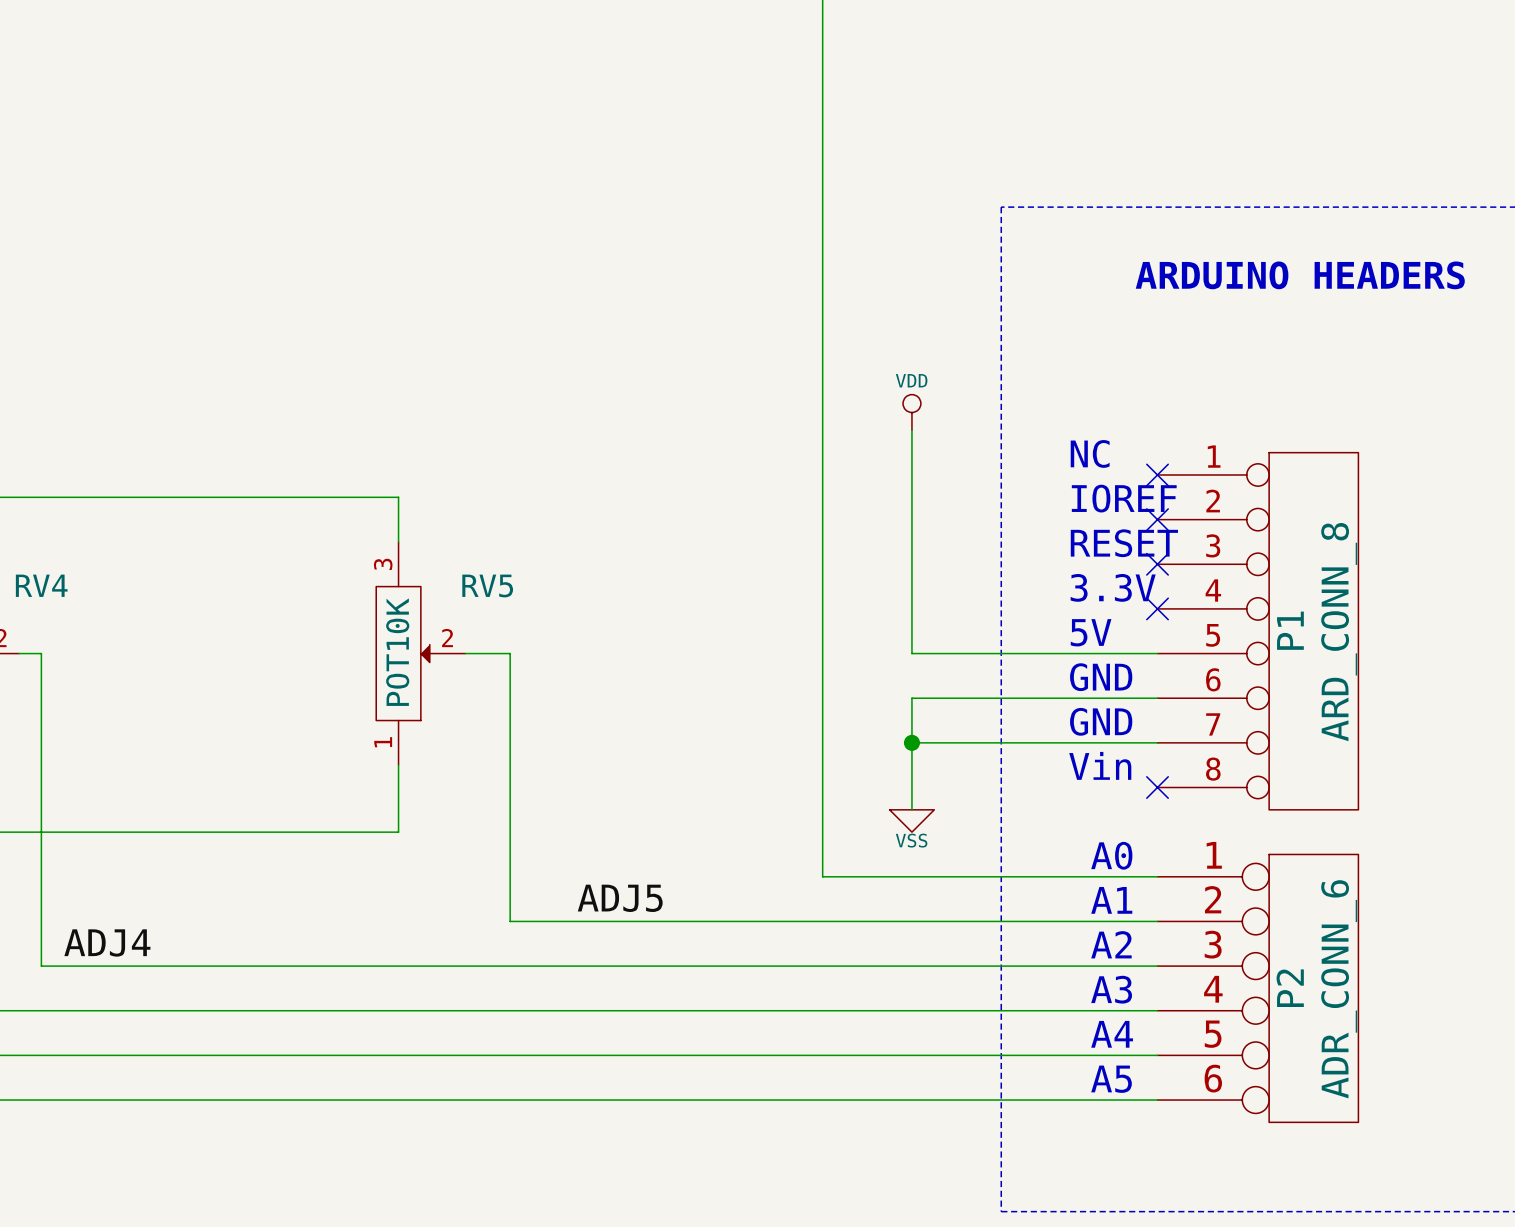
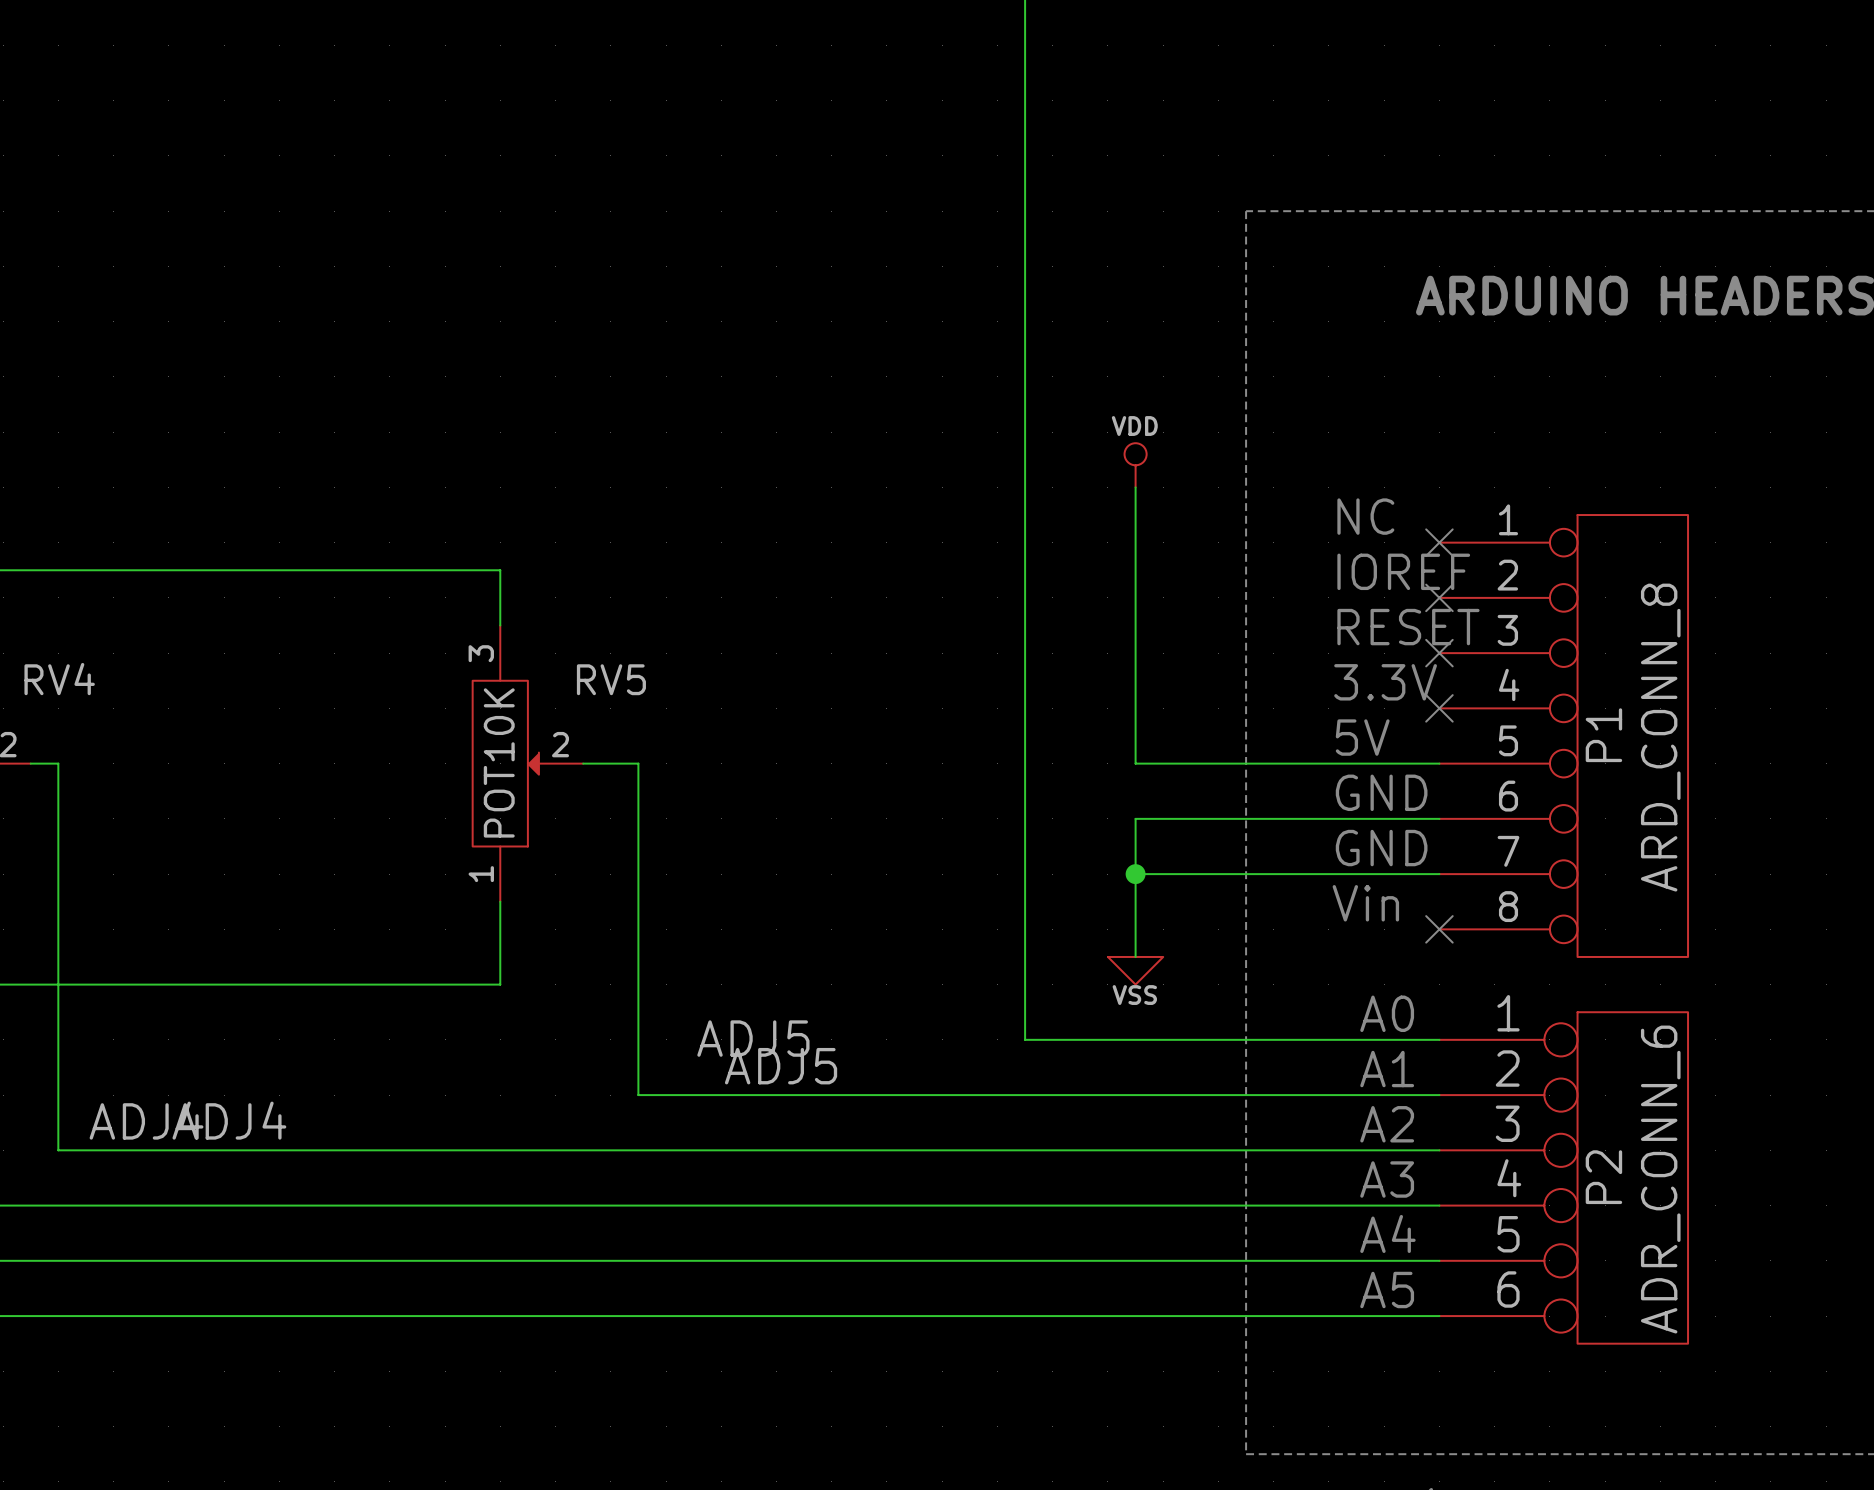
label: none -> ADJ5 (753, 1038)
label: none -> ADJ4 (229, 1120)

